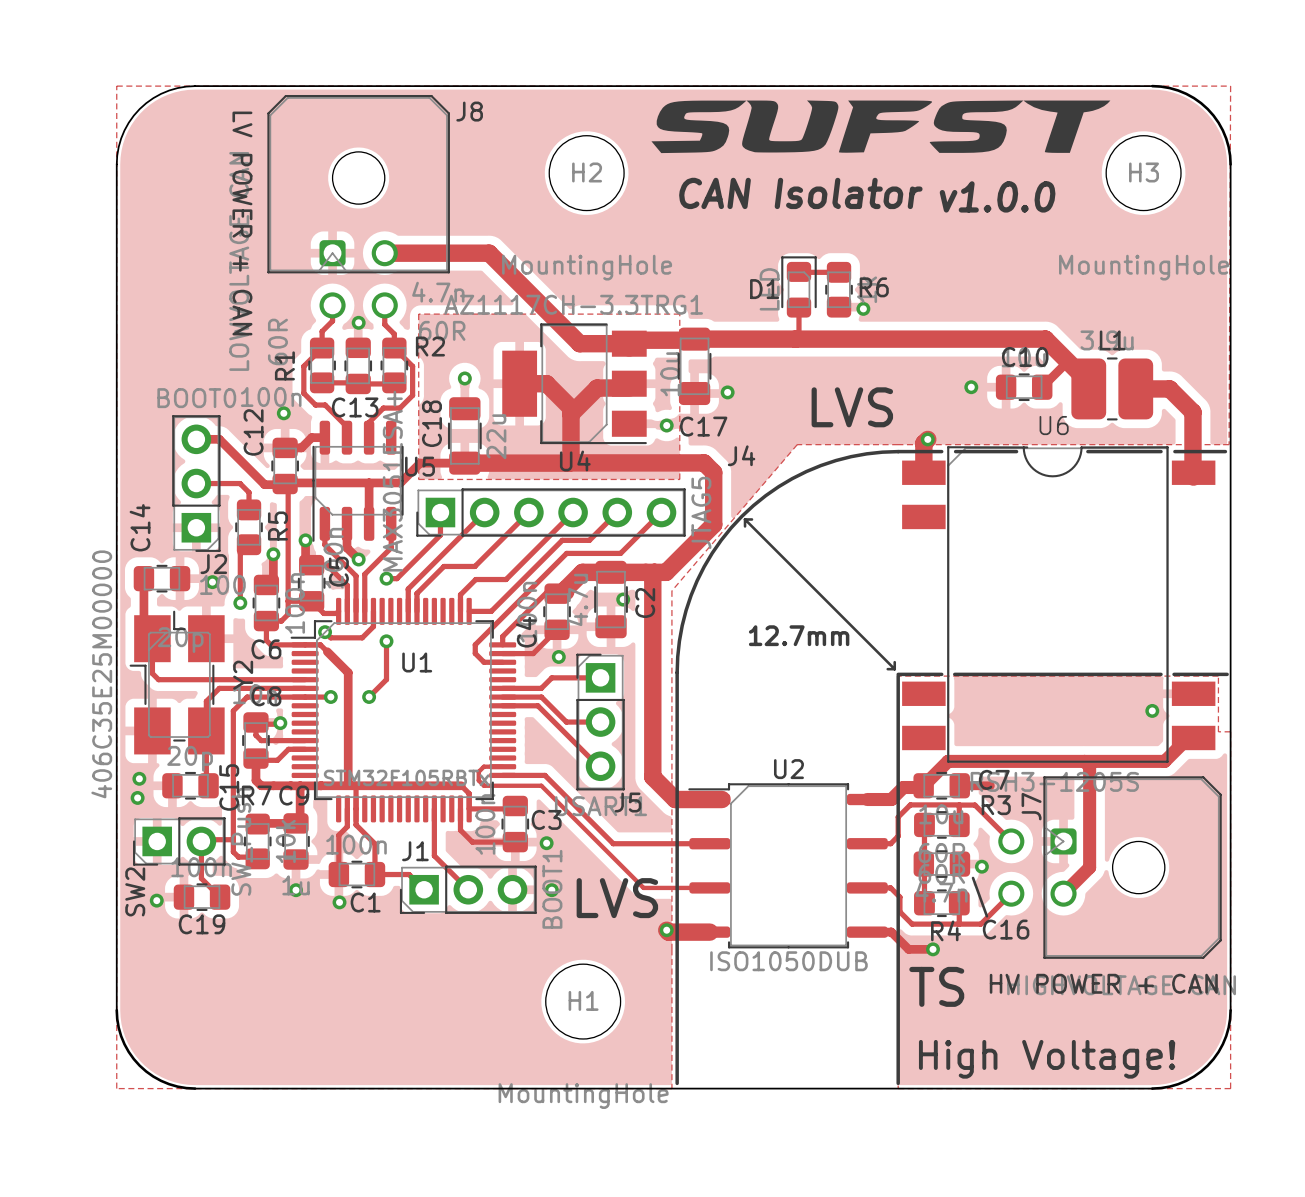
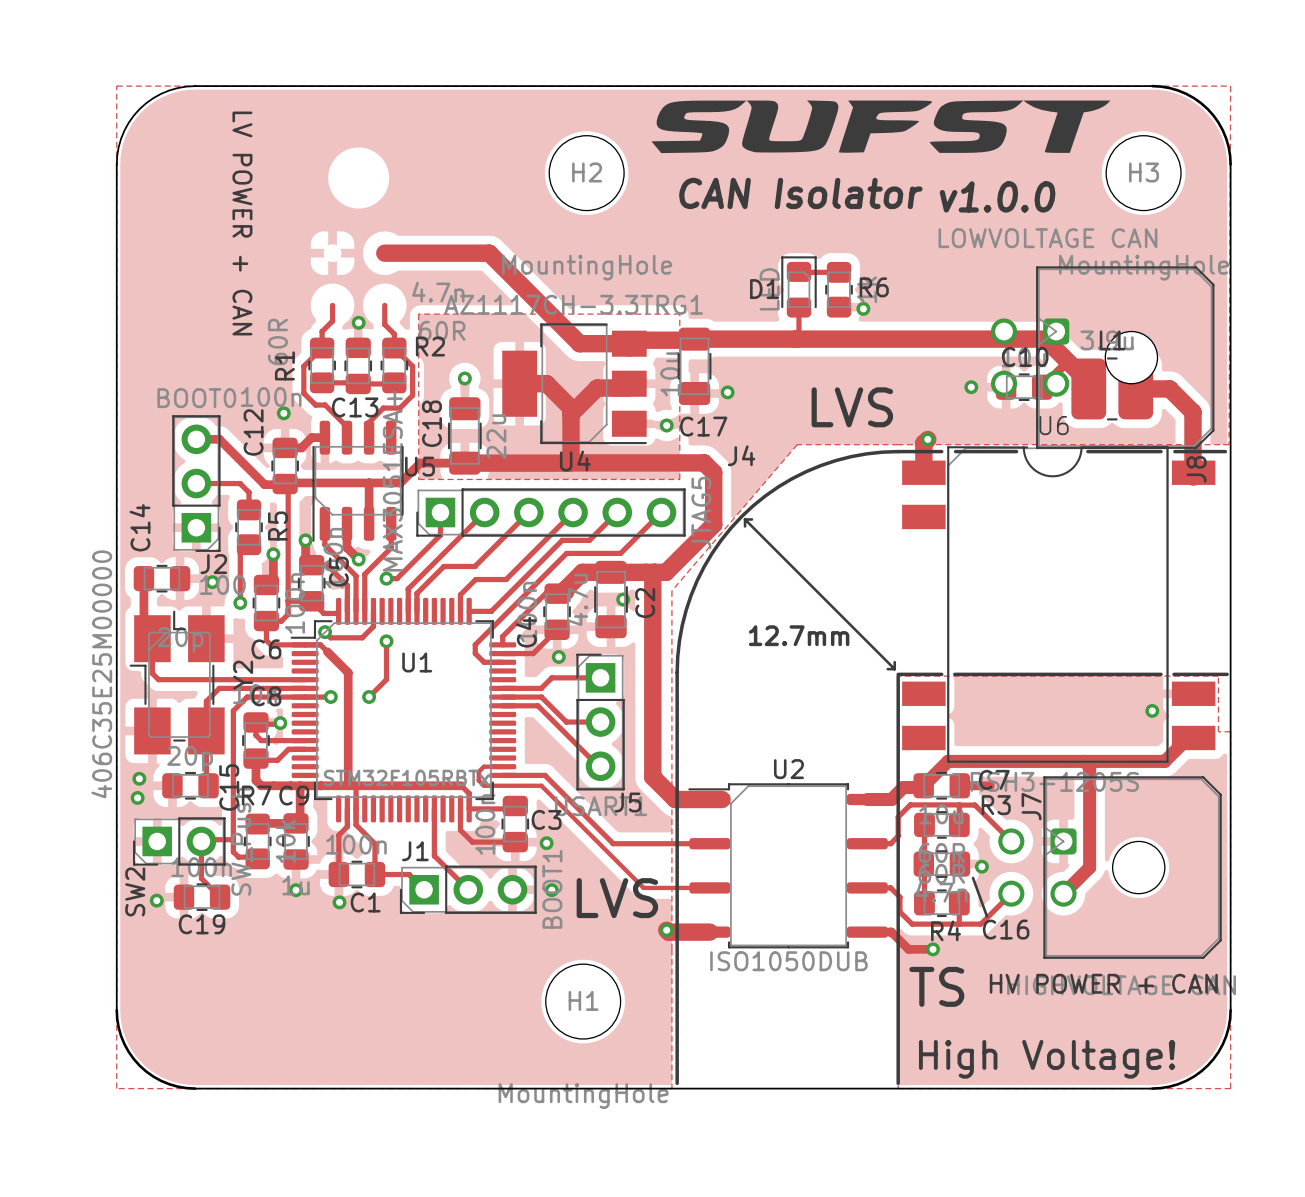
J8 rotation: 0° (358, 206) -> 90° clockwise (1102, 357)
J8 position: (358, 206) -> (1102, 357)

